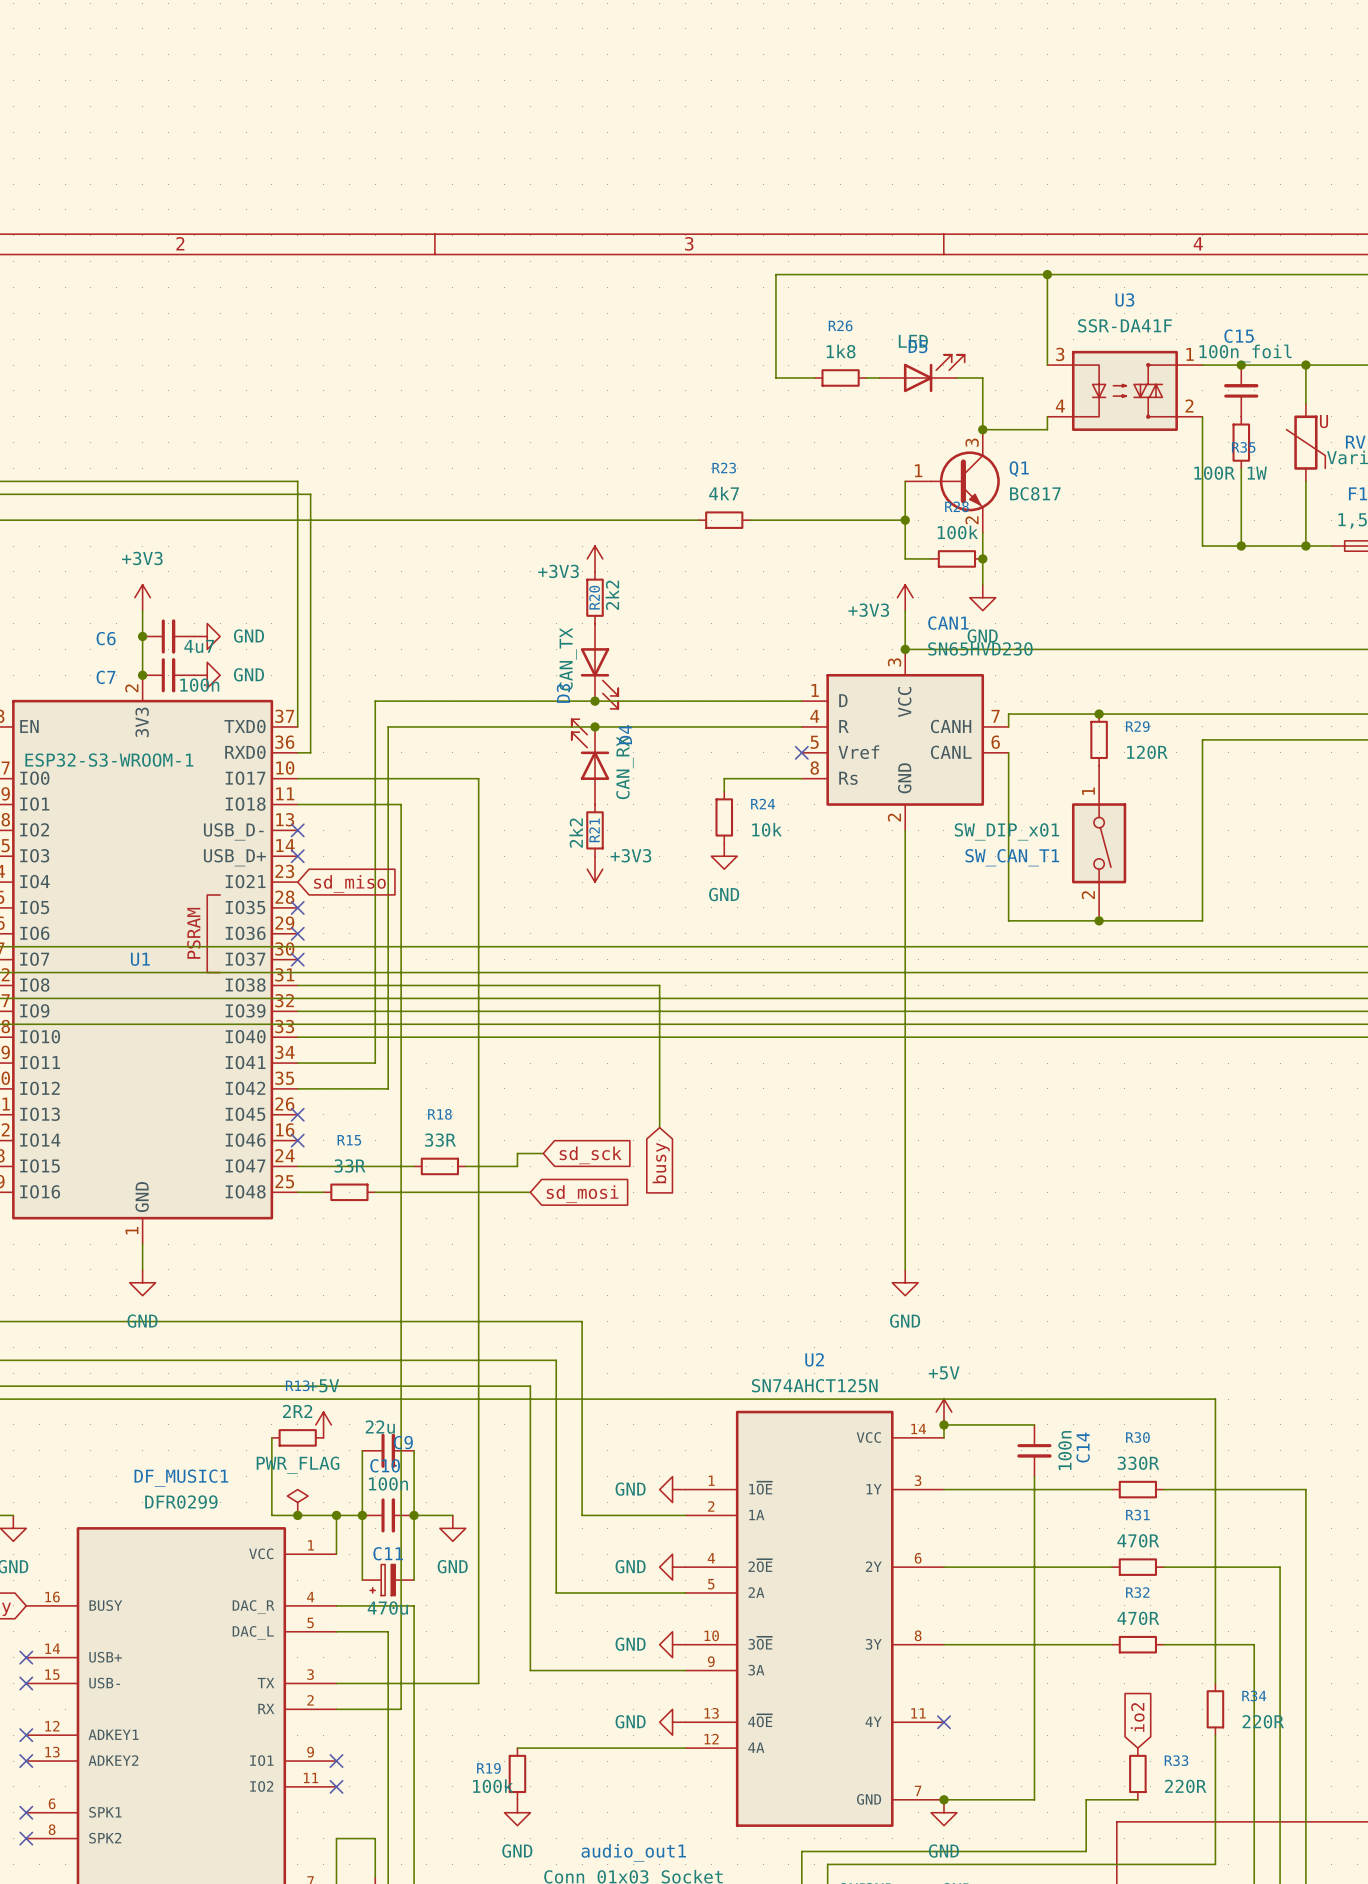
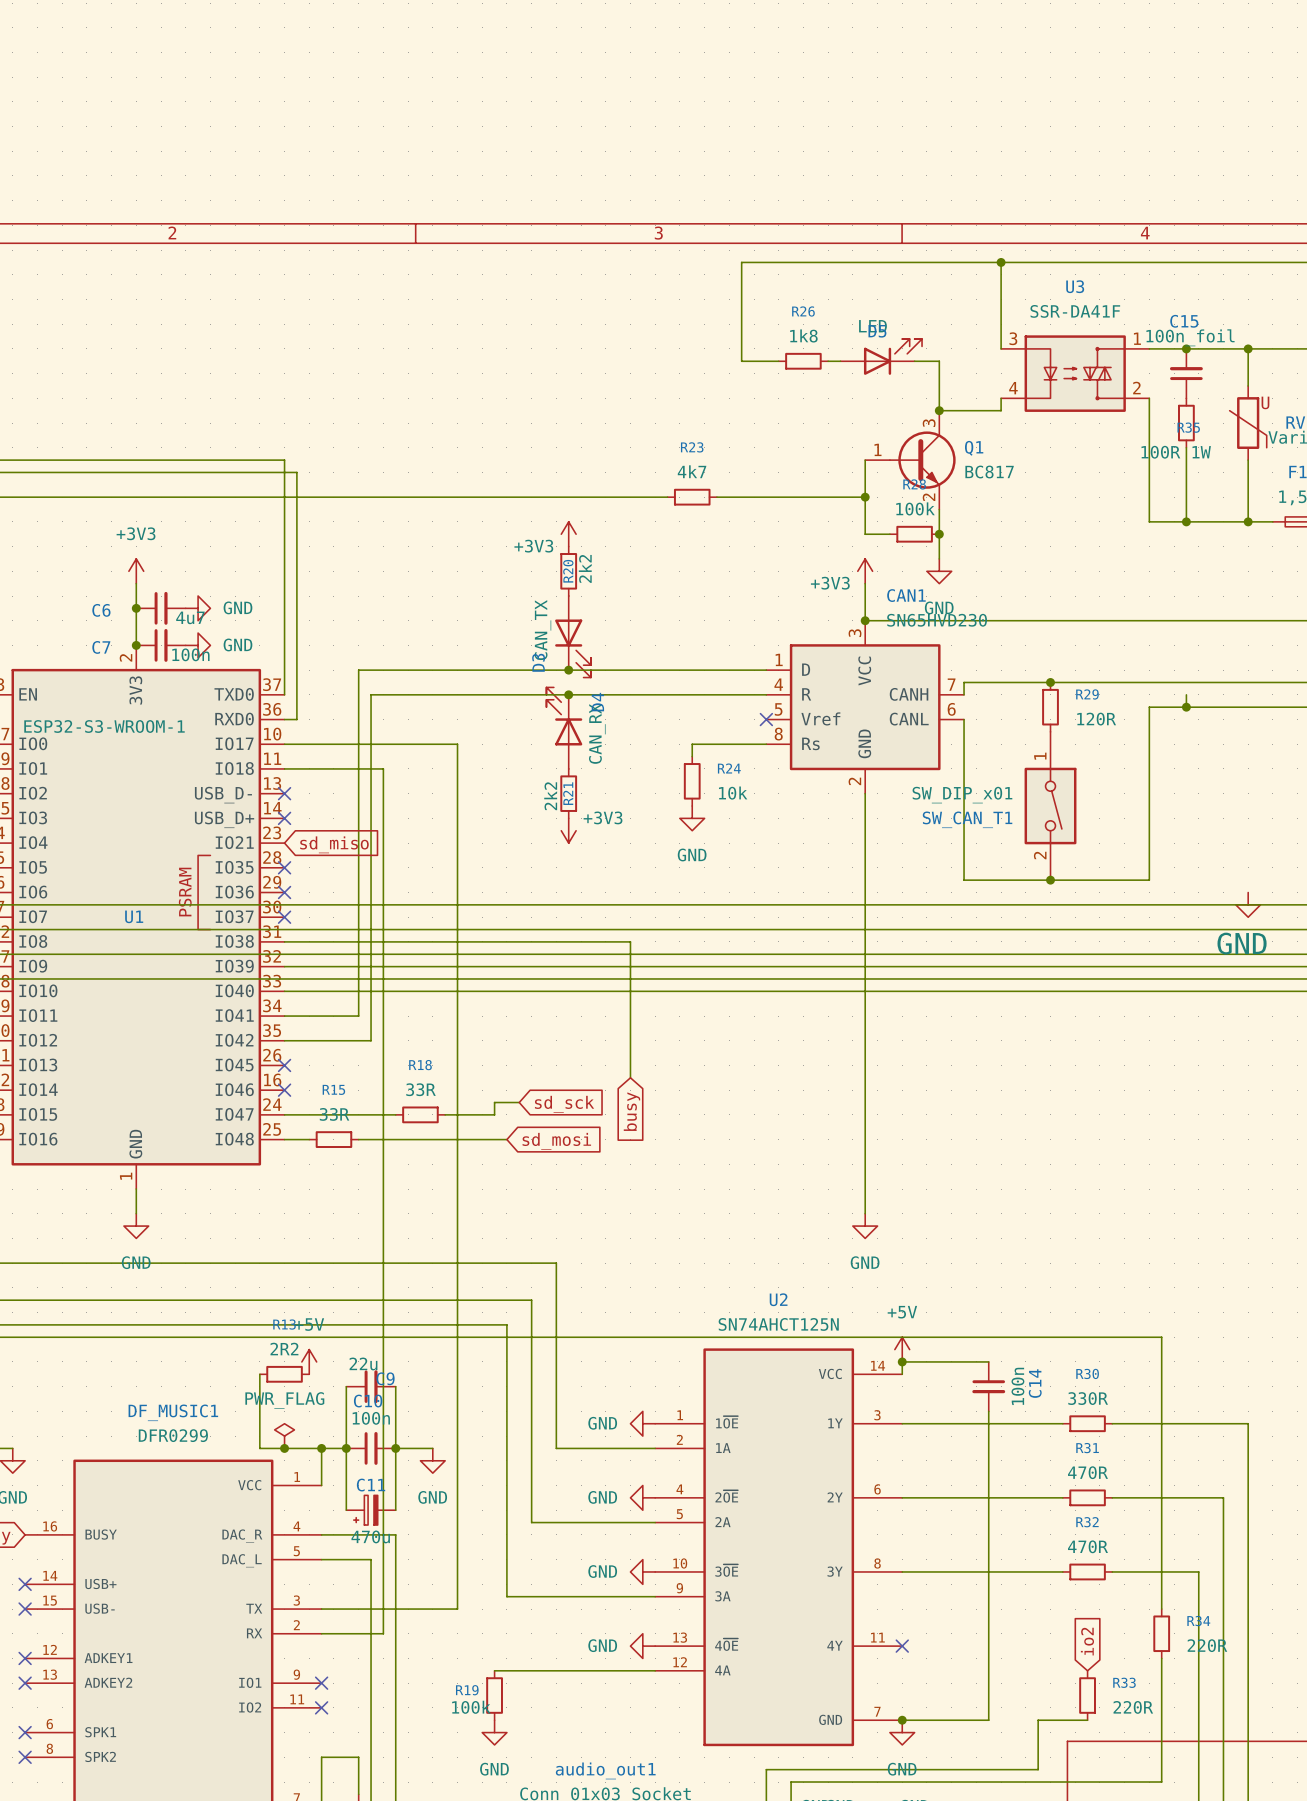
wire: none -> (1186, 694) (1186, 707)
junction: none -> (1186, 707)
power symbol: none -> GND (1248, 904)

